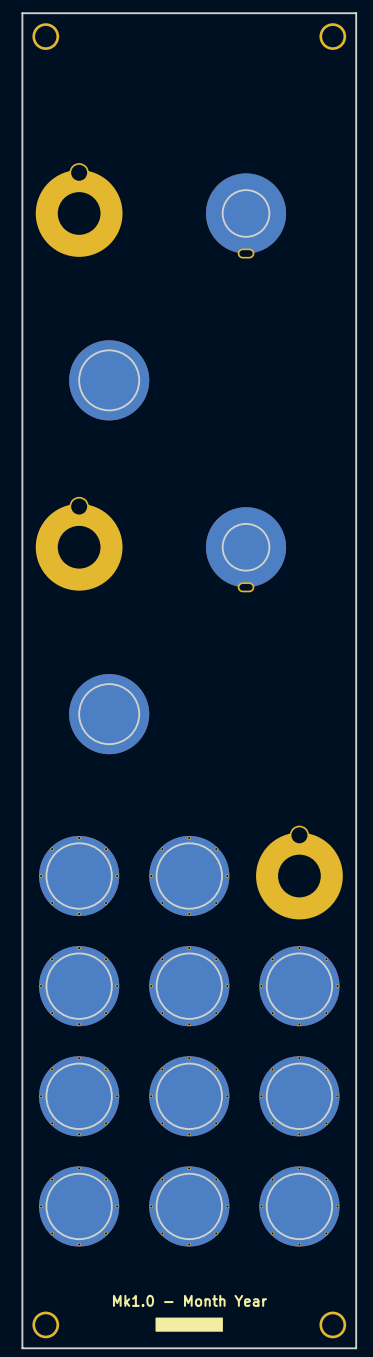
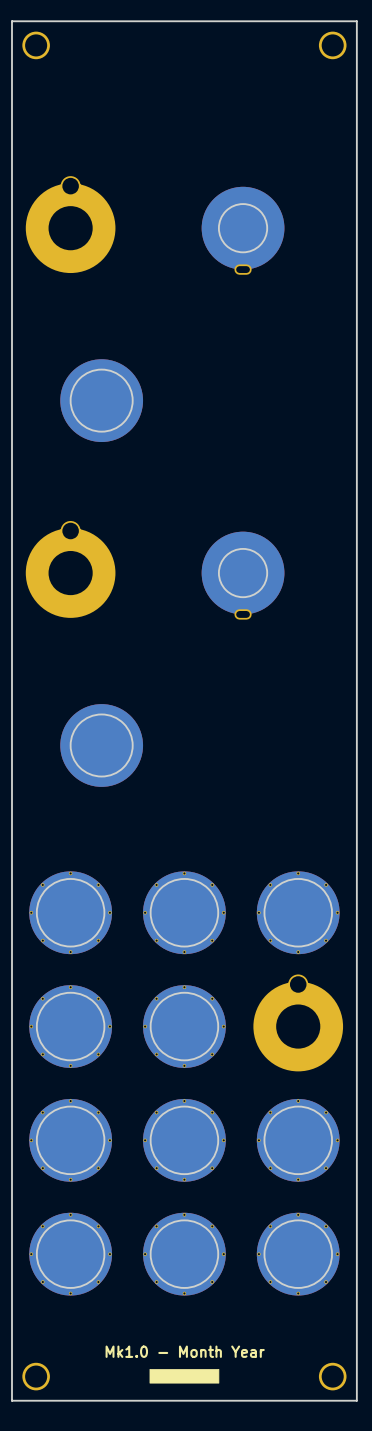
part footprint: [256, 825, 343, 920] -> [256, 871, 340, 955]
part footprint: [259, 946, 340, 1027] -> [253, 974, 344, 1072]

